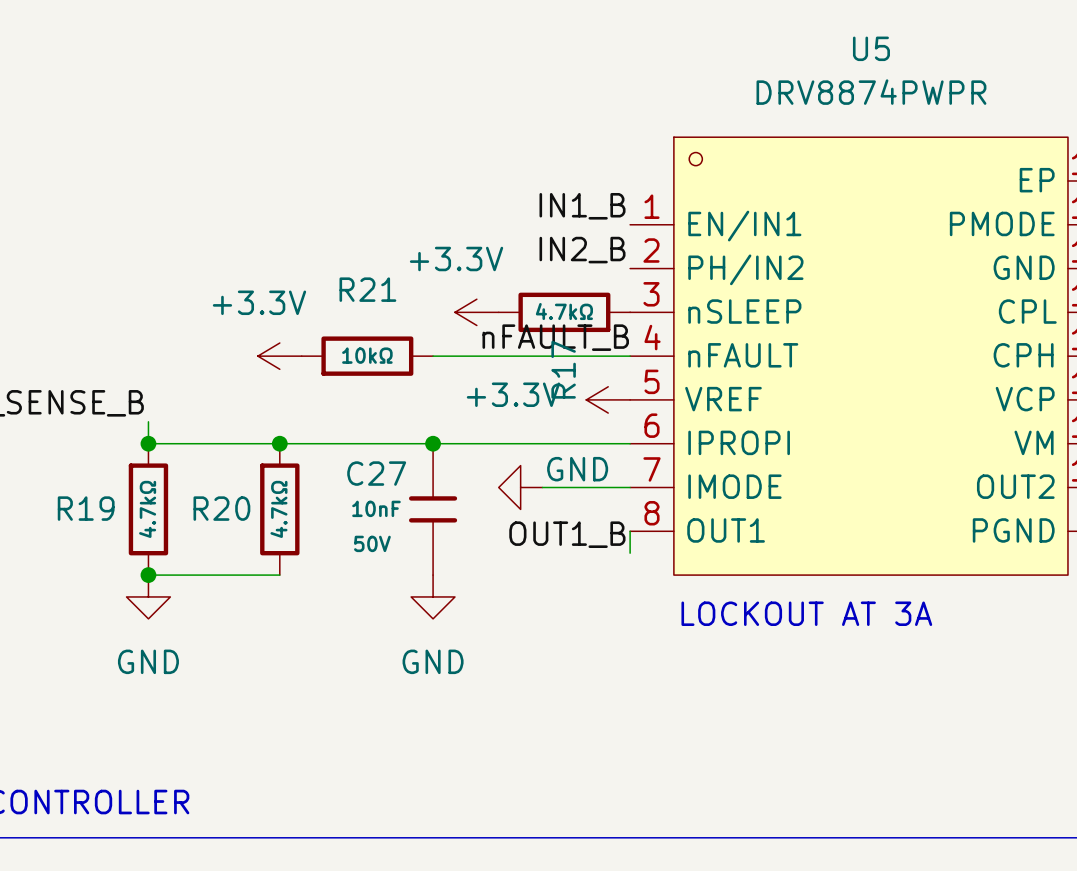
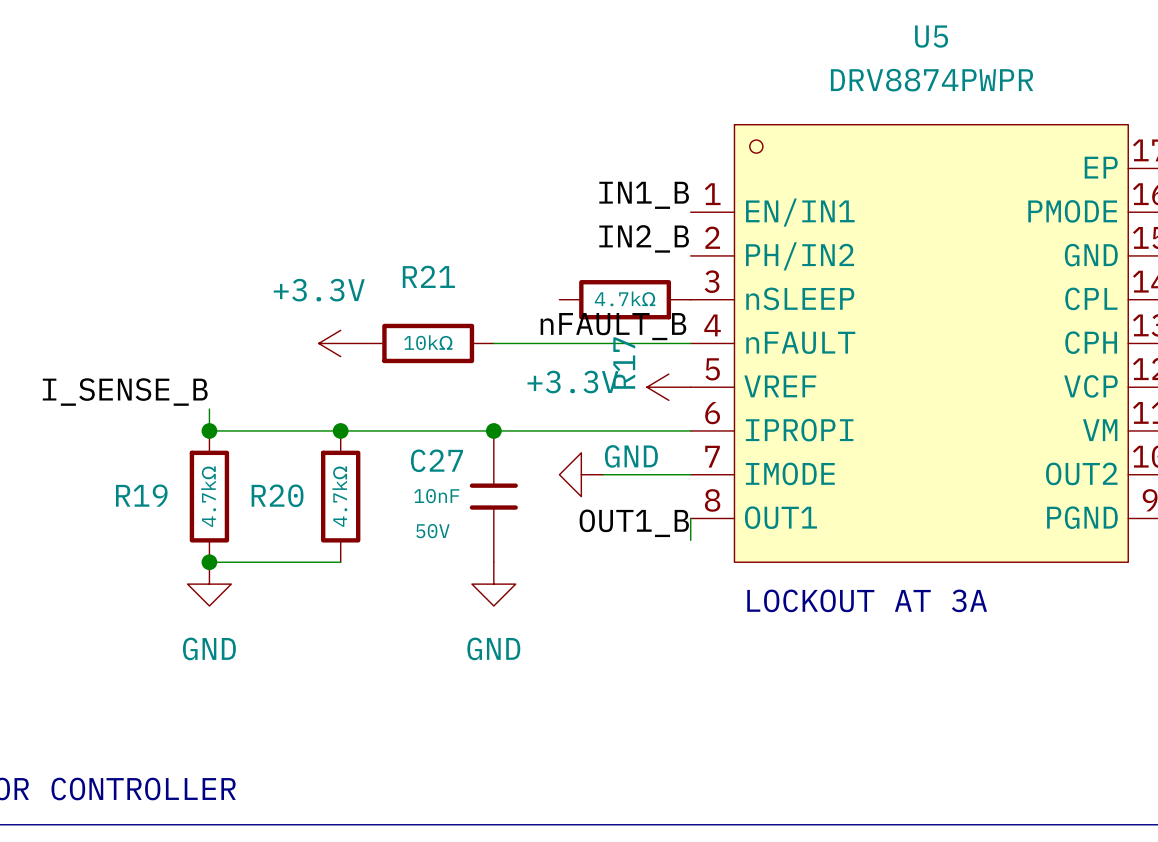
power symbol: +3.3V (476, 312) -> none

